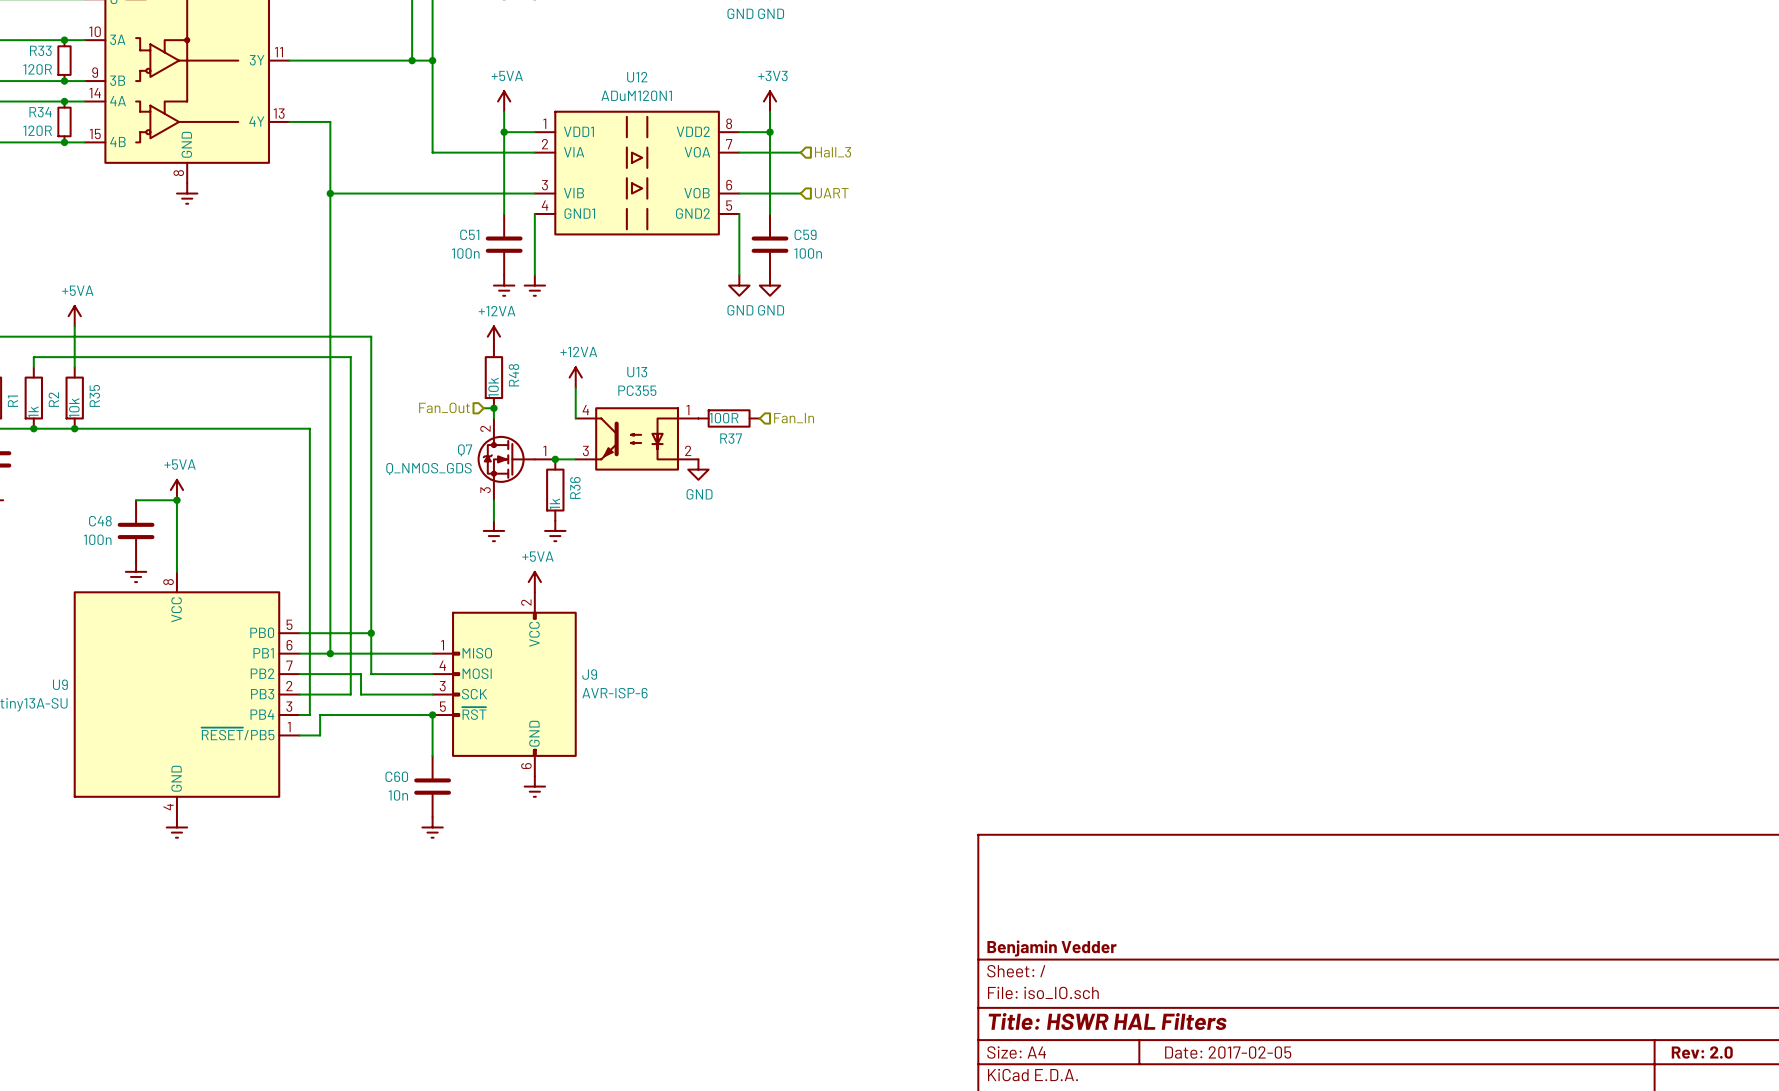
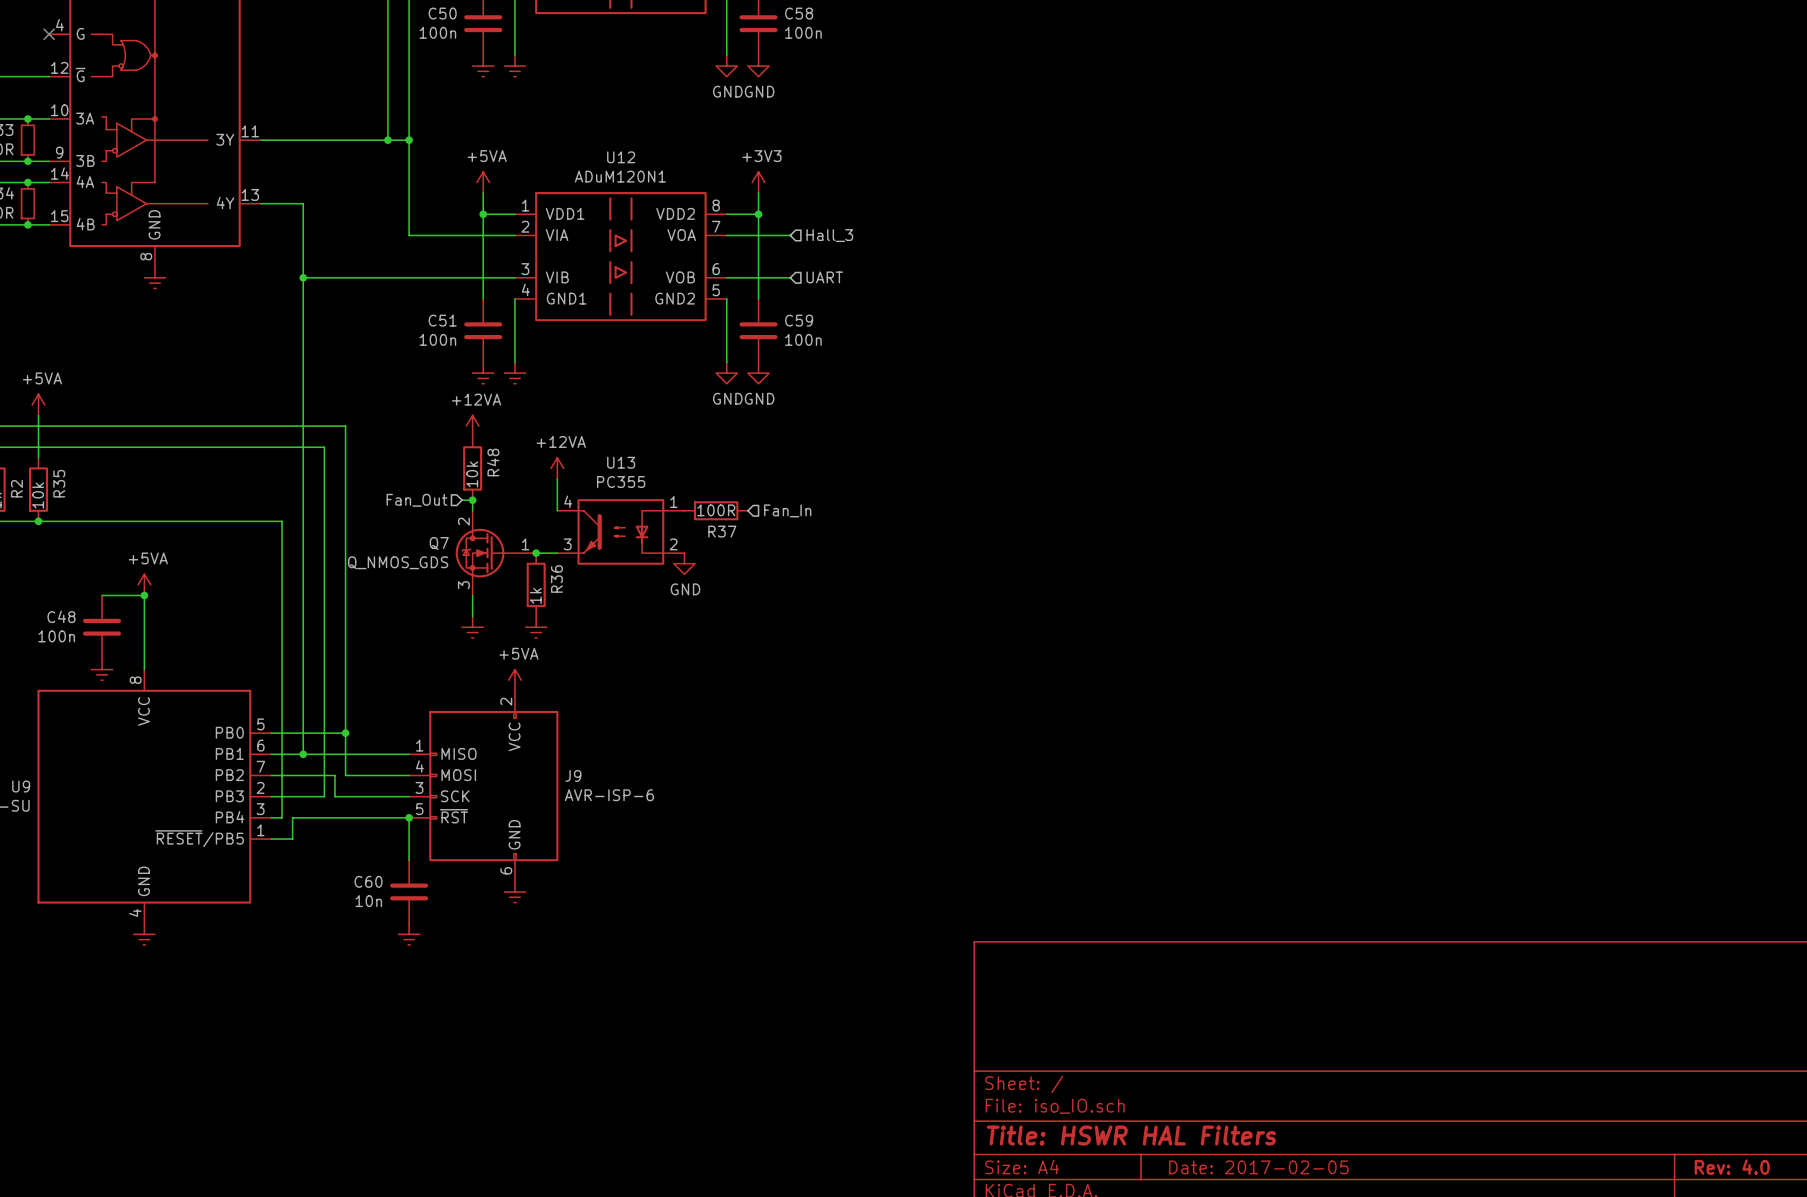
title block: Benjamin Vedder (1052, 948) -> none
title block: Rev: 2.0 (1702, 1052) -> Rev: 4.0 (1732, 1167)

